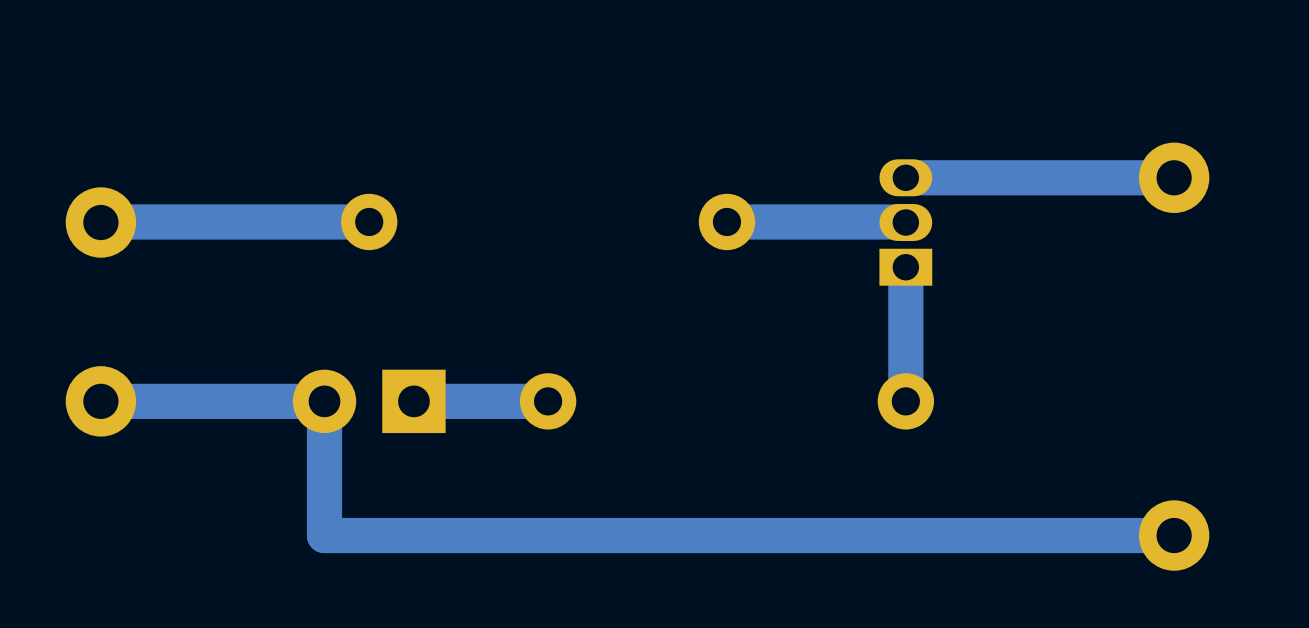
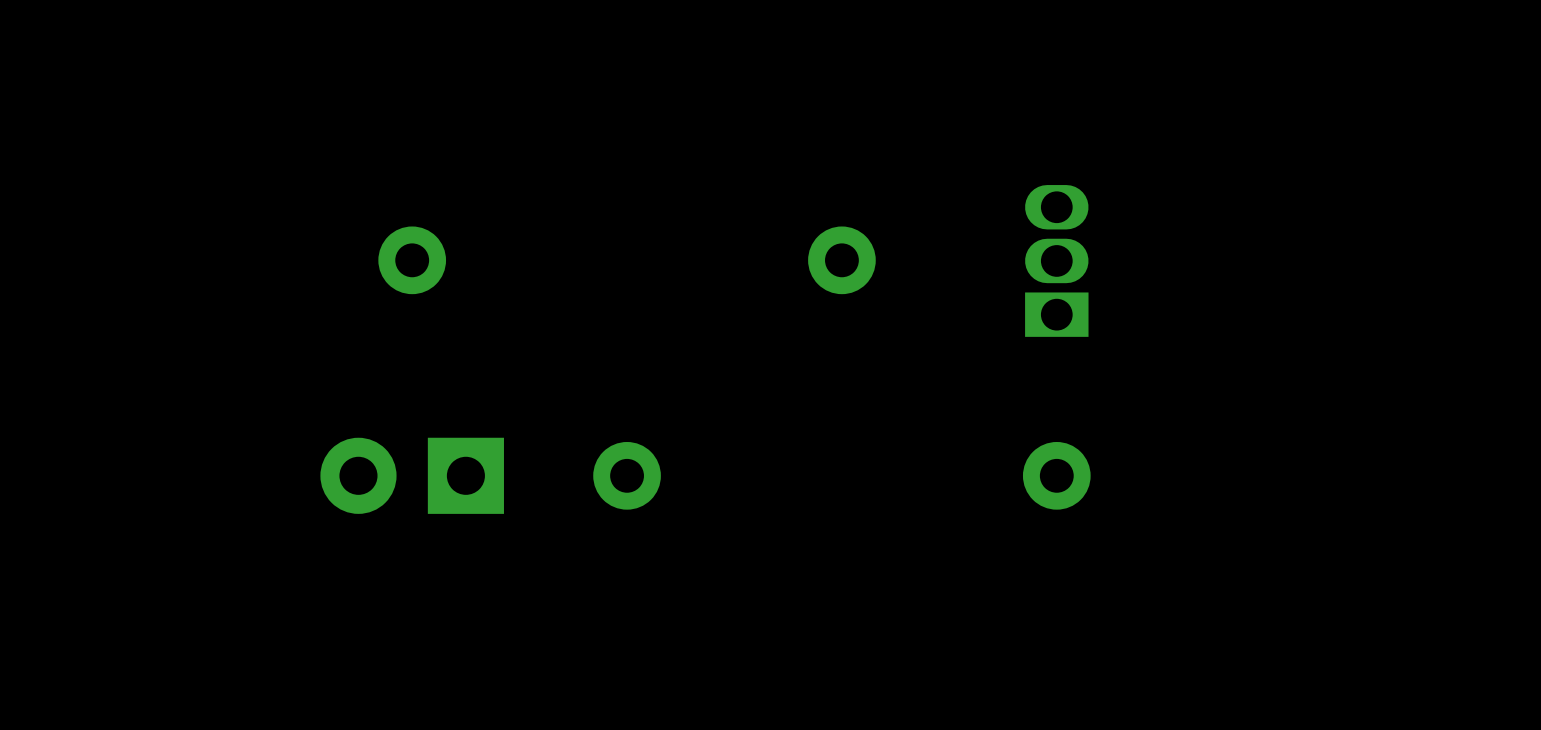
bottom track: (1174, 177) (905, 177) -> none
part: (1174, 177) -> none
bottom track: (369, 221) (100, 222) -> none
bottom track: (726, 221) (905, 222) -> none
part: (100, 222) -> none
bottom track: (905, 267) (905, 401) -> none
bottom track: (100, 401) (324, 401) (324, 535) (1174, 535) -> none
part: (100, 401) -> none
bottom track: (548, 401) (413, 401) -> none
part: (1174, 535) -> none

